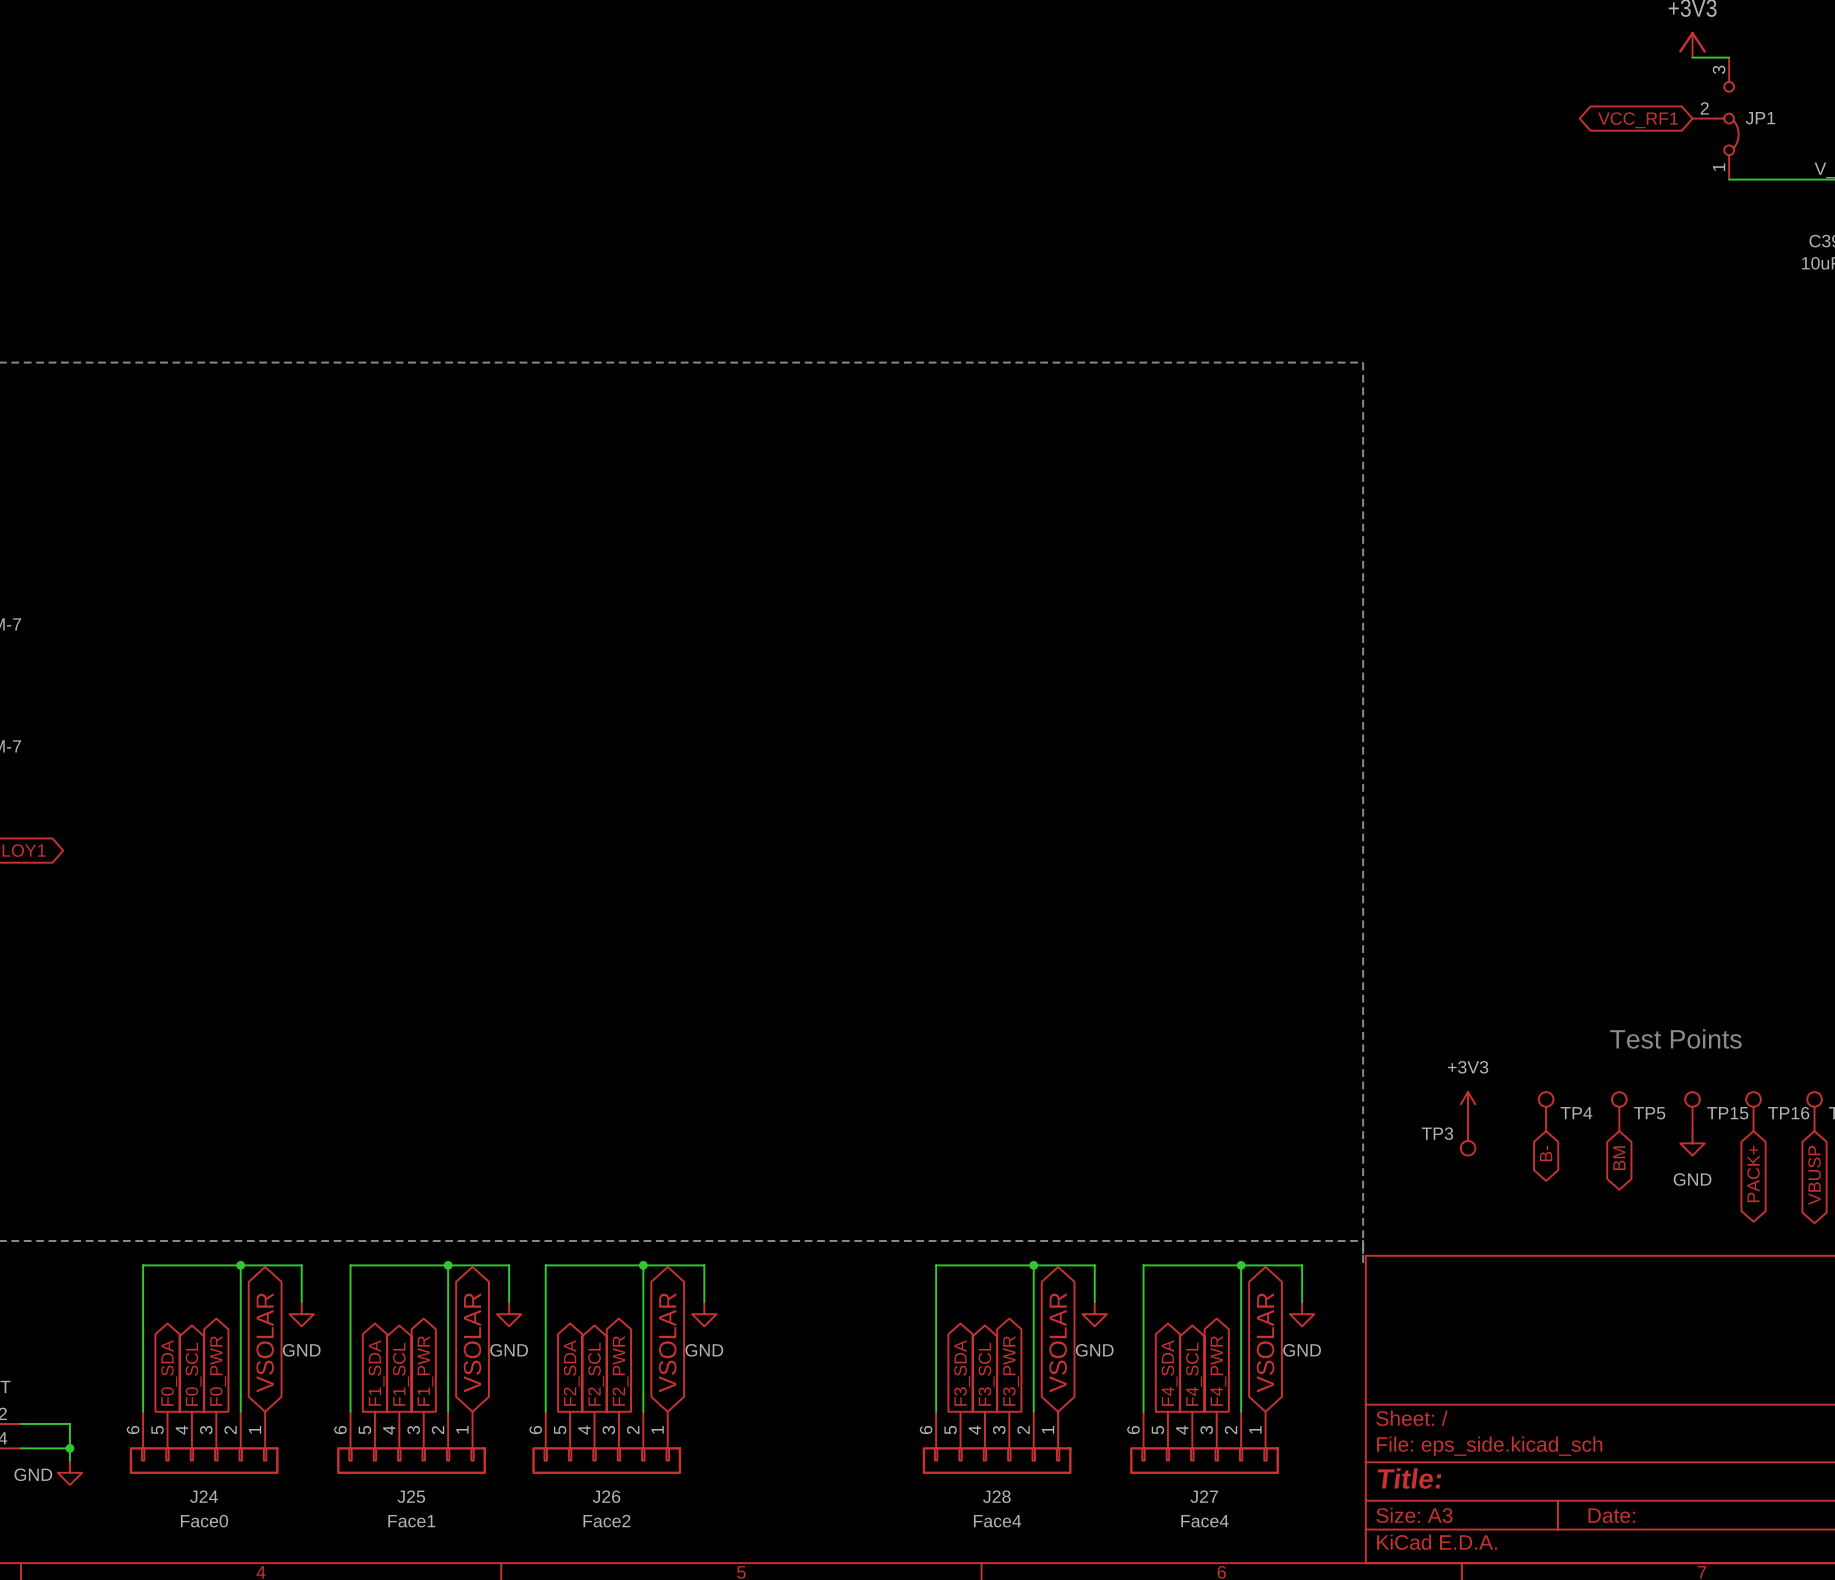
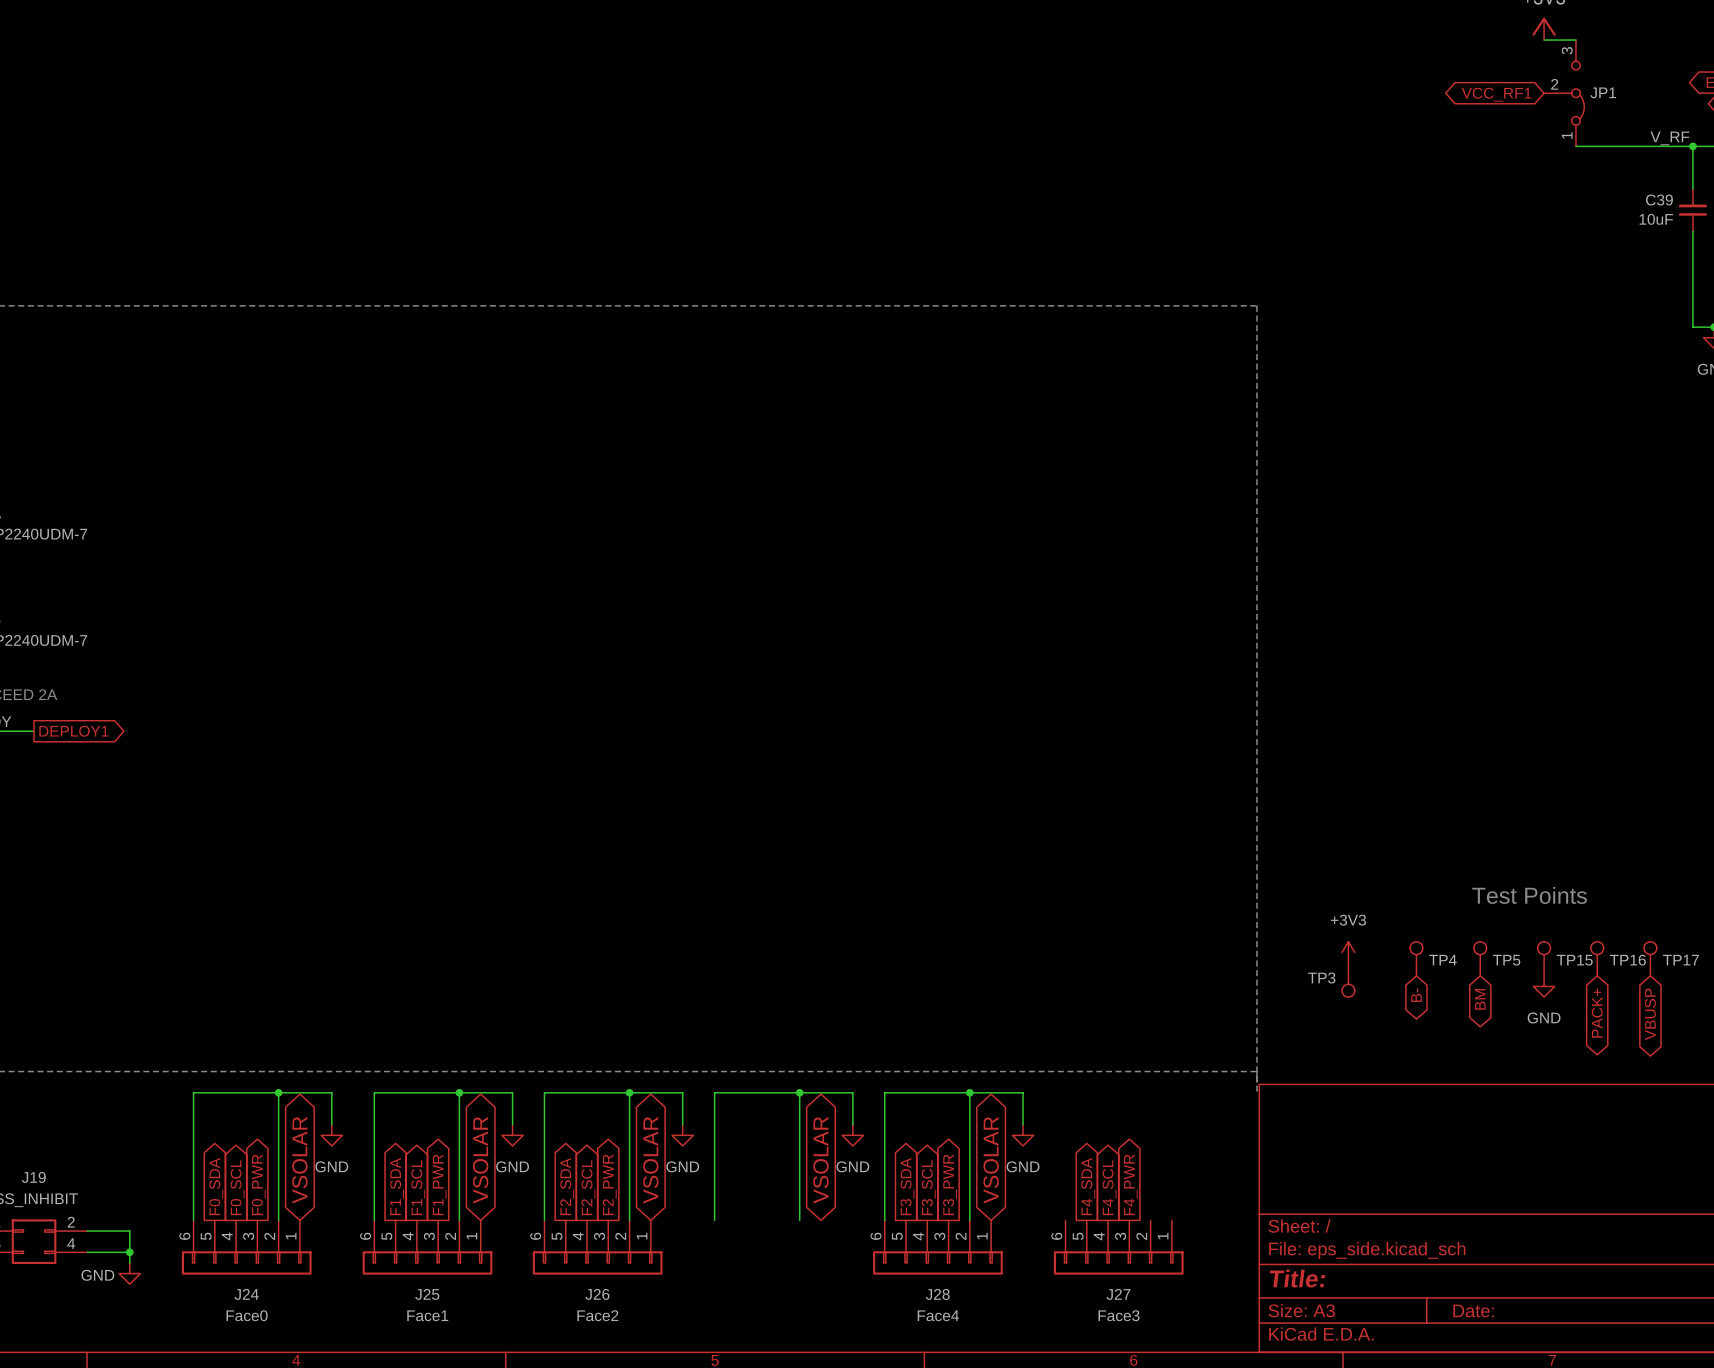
wire: none -> (799, 1092) (799, 1220)
junction: none -> (799, 1092)
wire: (1241, 1265) (1241, 1411) -> none
junction: (1241, 1265) -> none
wire: none -> (852, 1124) (852, 1092) (714, 1092) (714, 1220)
wire: (1302, 1301) (1302, 1265) (1143, 1265) (1143, 1411) -> none
power symbol: none -> GND (852, 1135)
power symbol: GND (1302, 1314) -> none
global label: none -> VSOLAR (820, 1160)
global label: VSOLAR (1265, 1342) -> none
J27 value: Face4 (1205, 1521) -> Face3 (1119, 1315)

